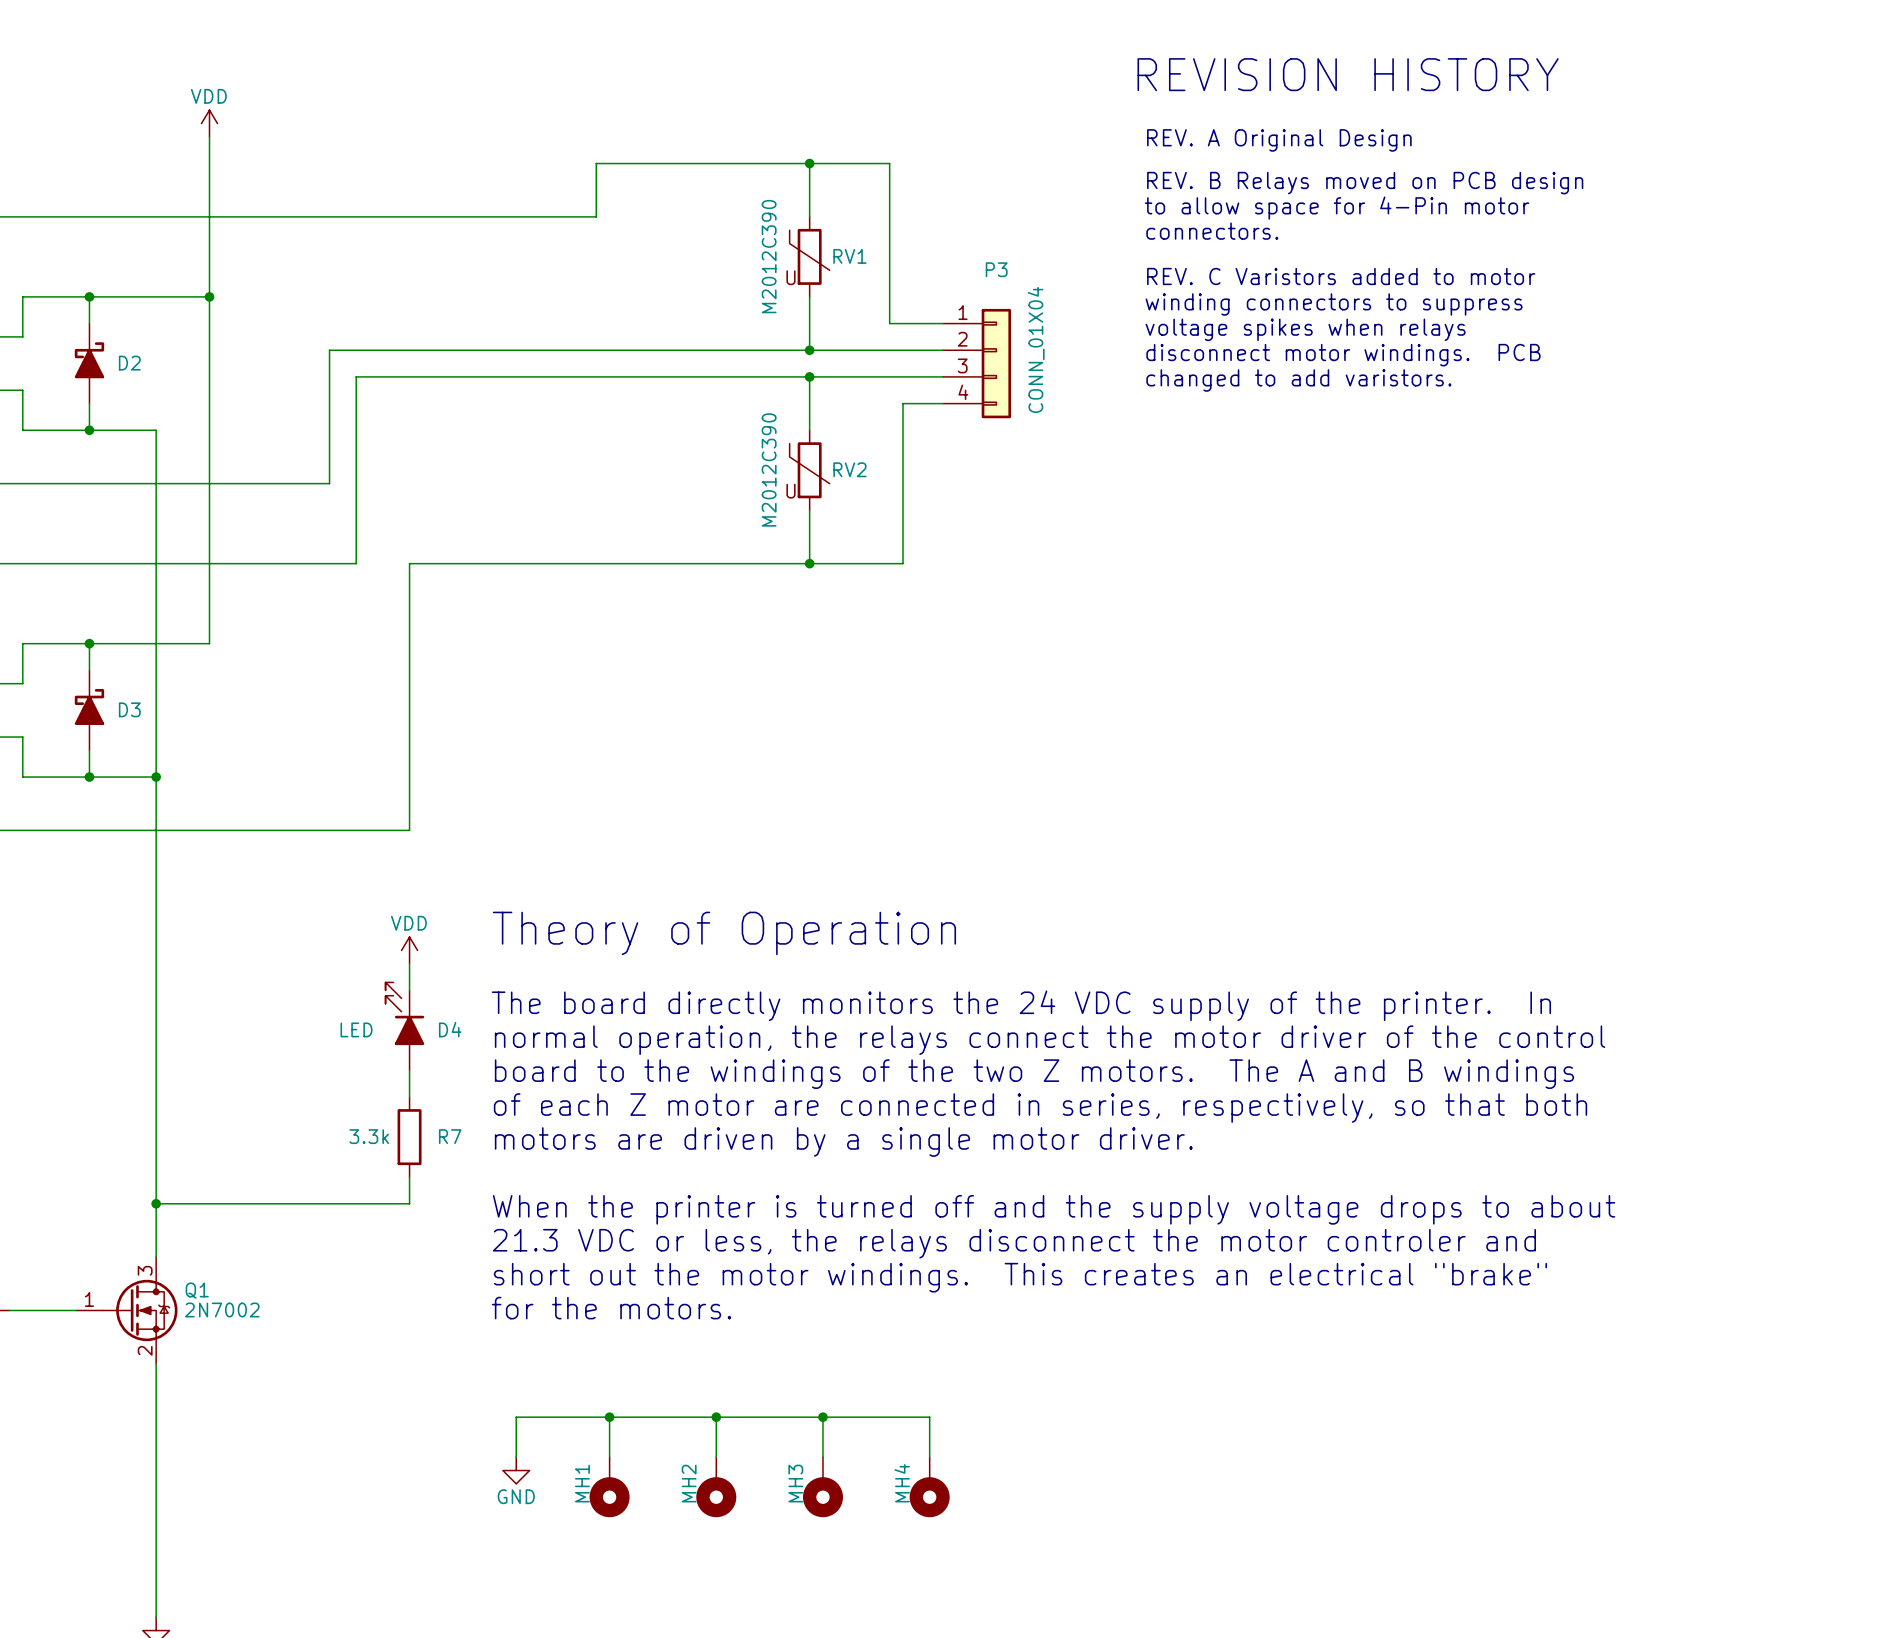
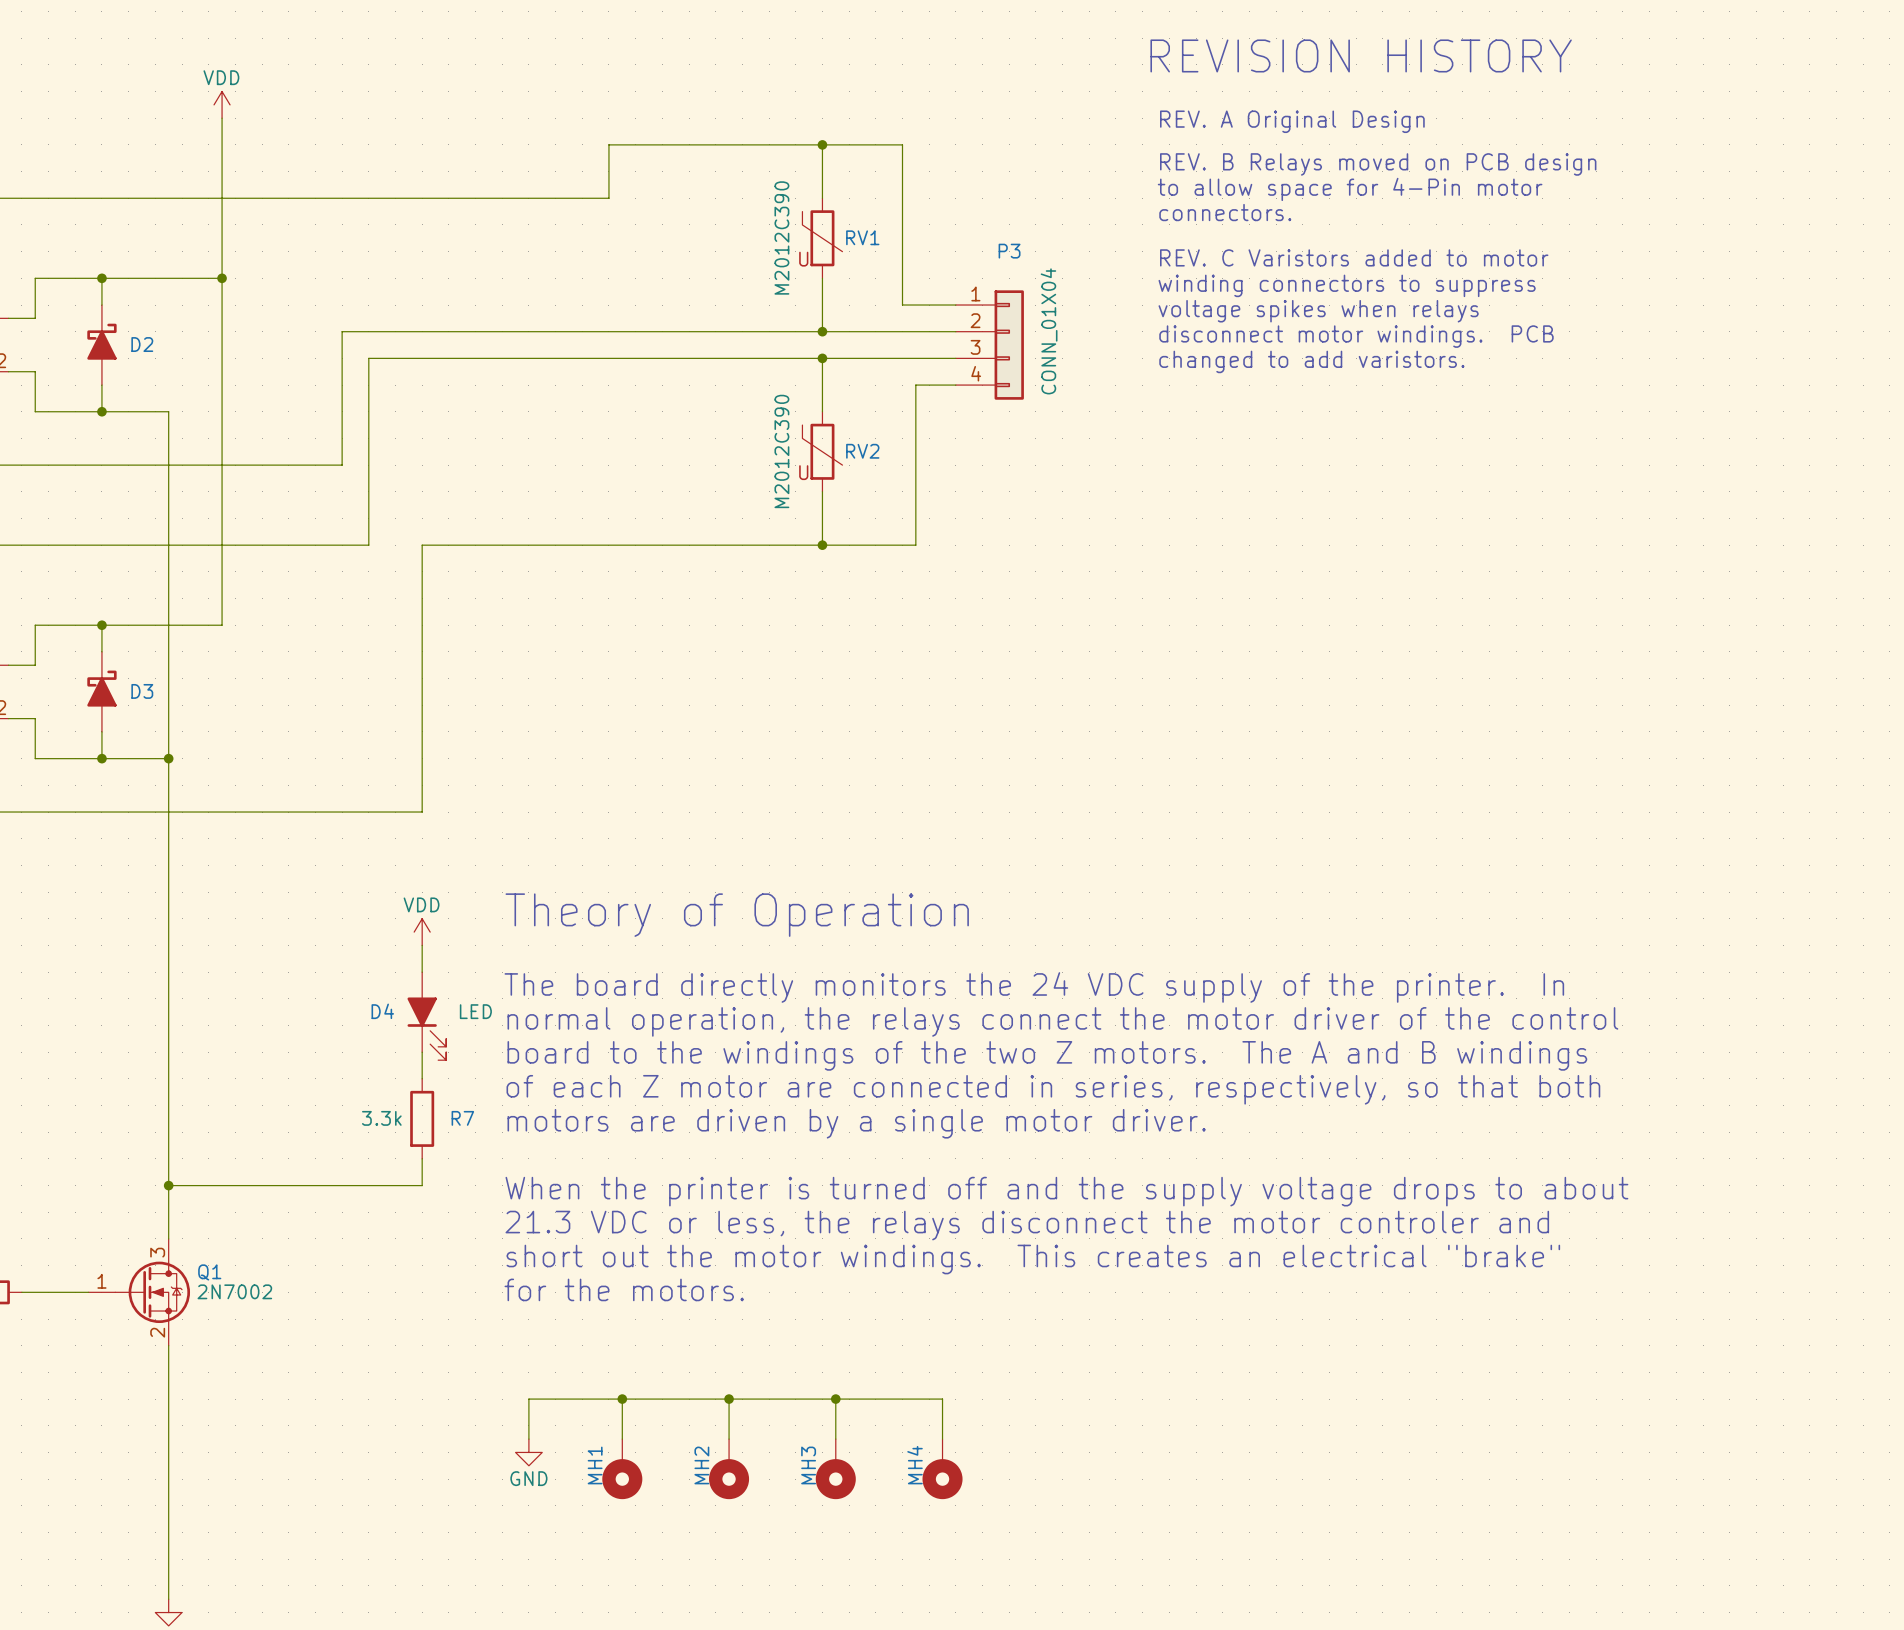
D4 rotation: 0° (404, 1013) -> 180° (426, 1028)

